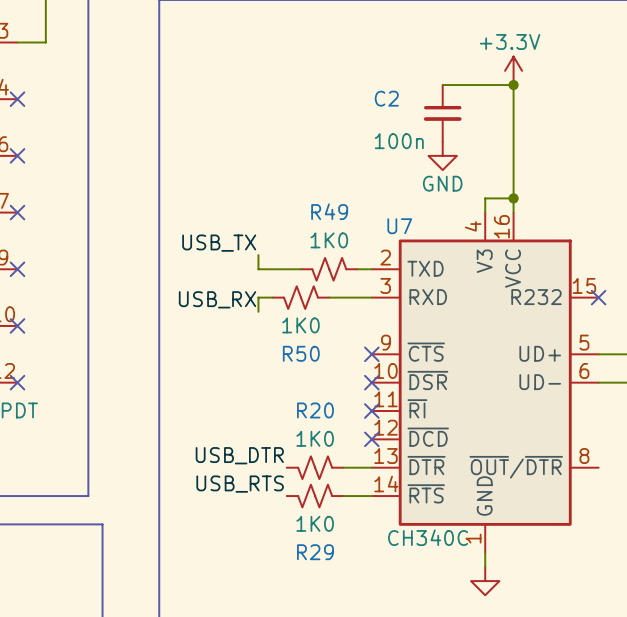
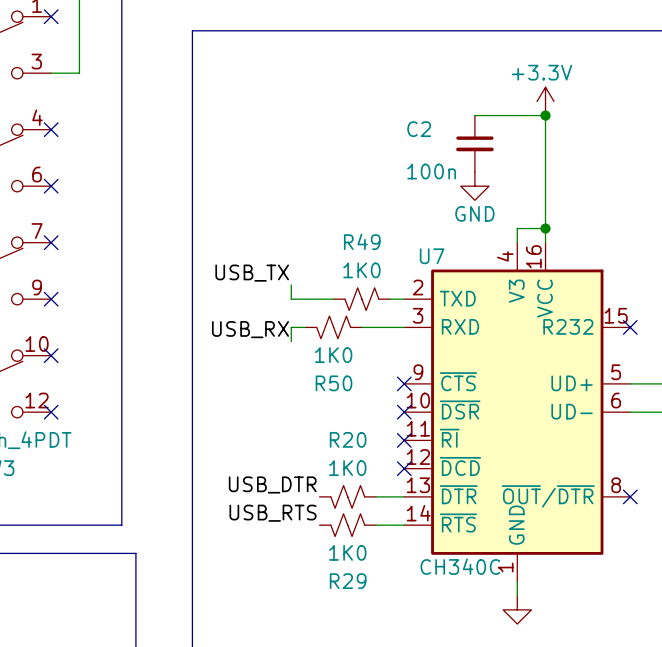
no-connect mark: none -> (630, 496)

